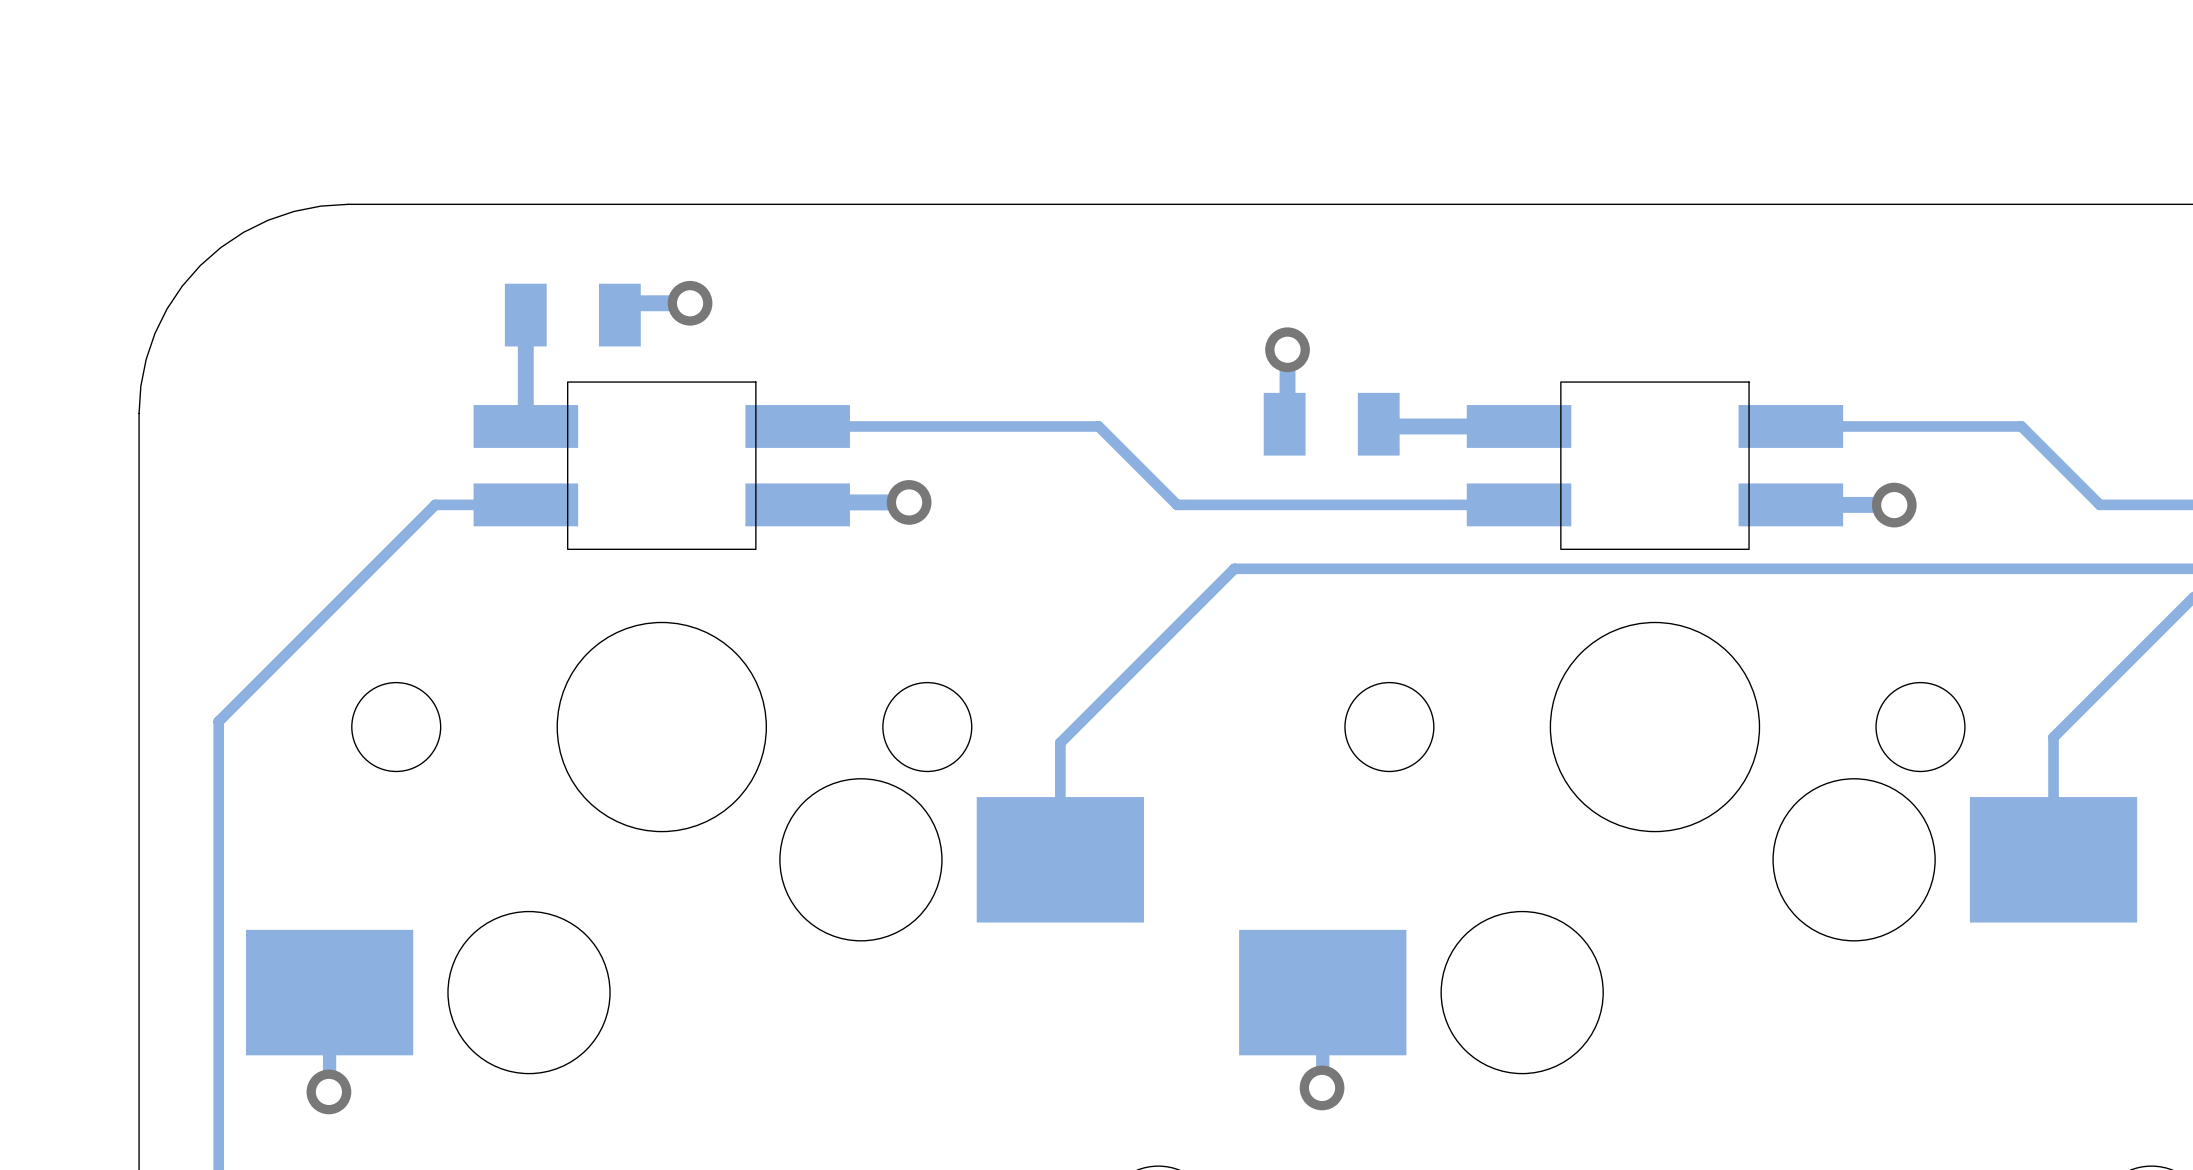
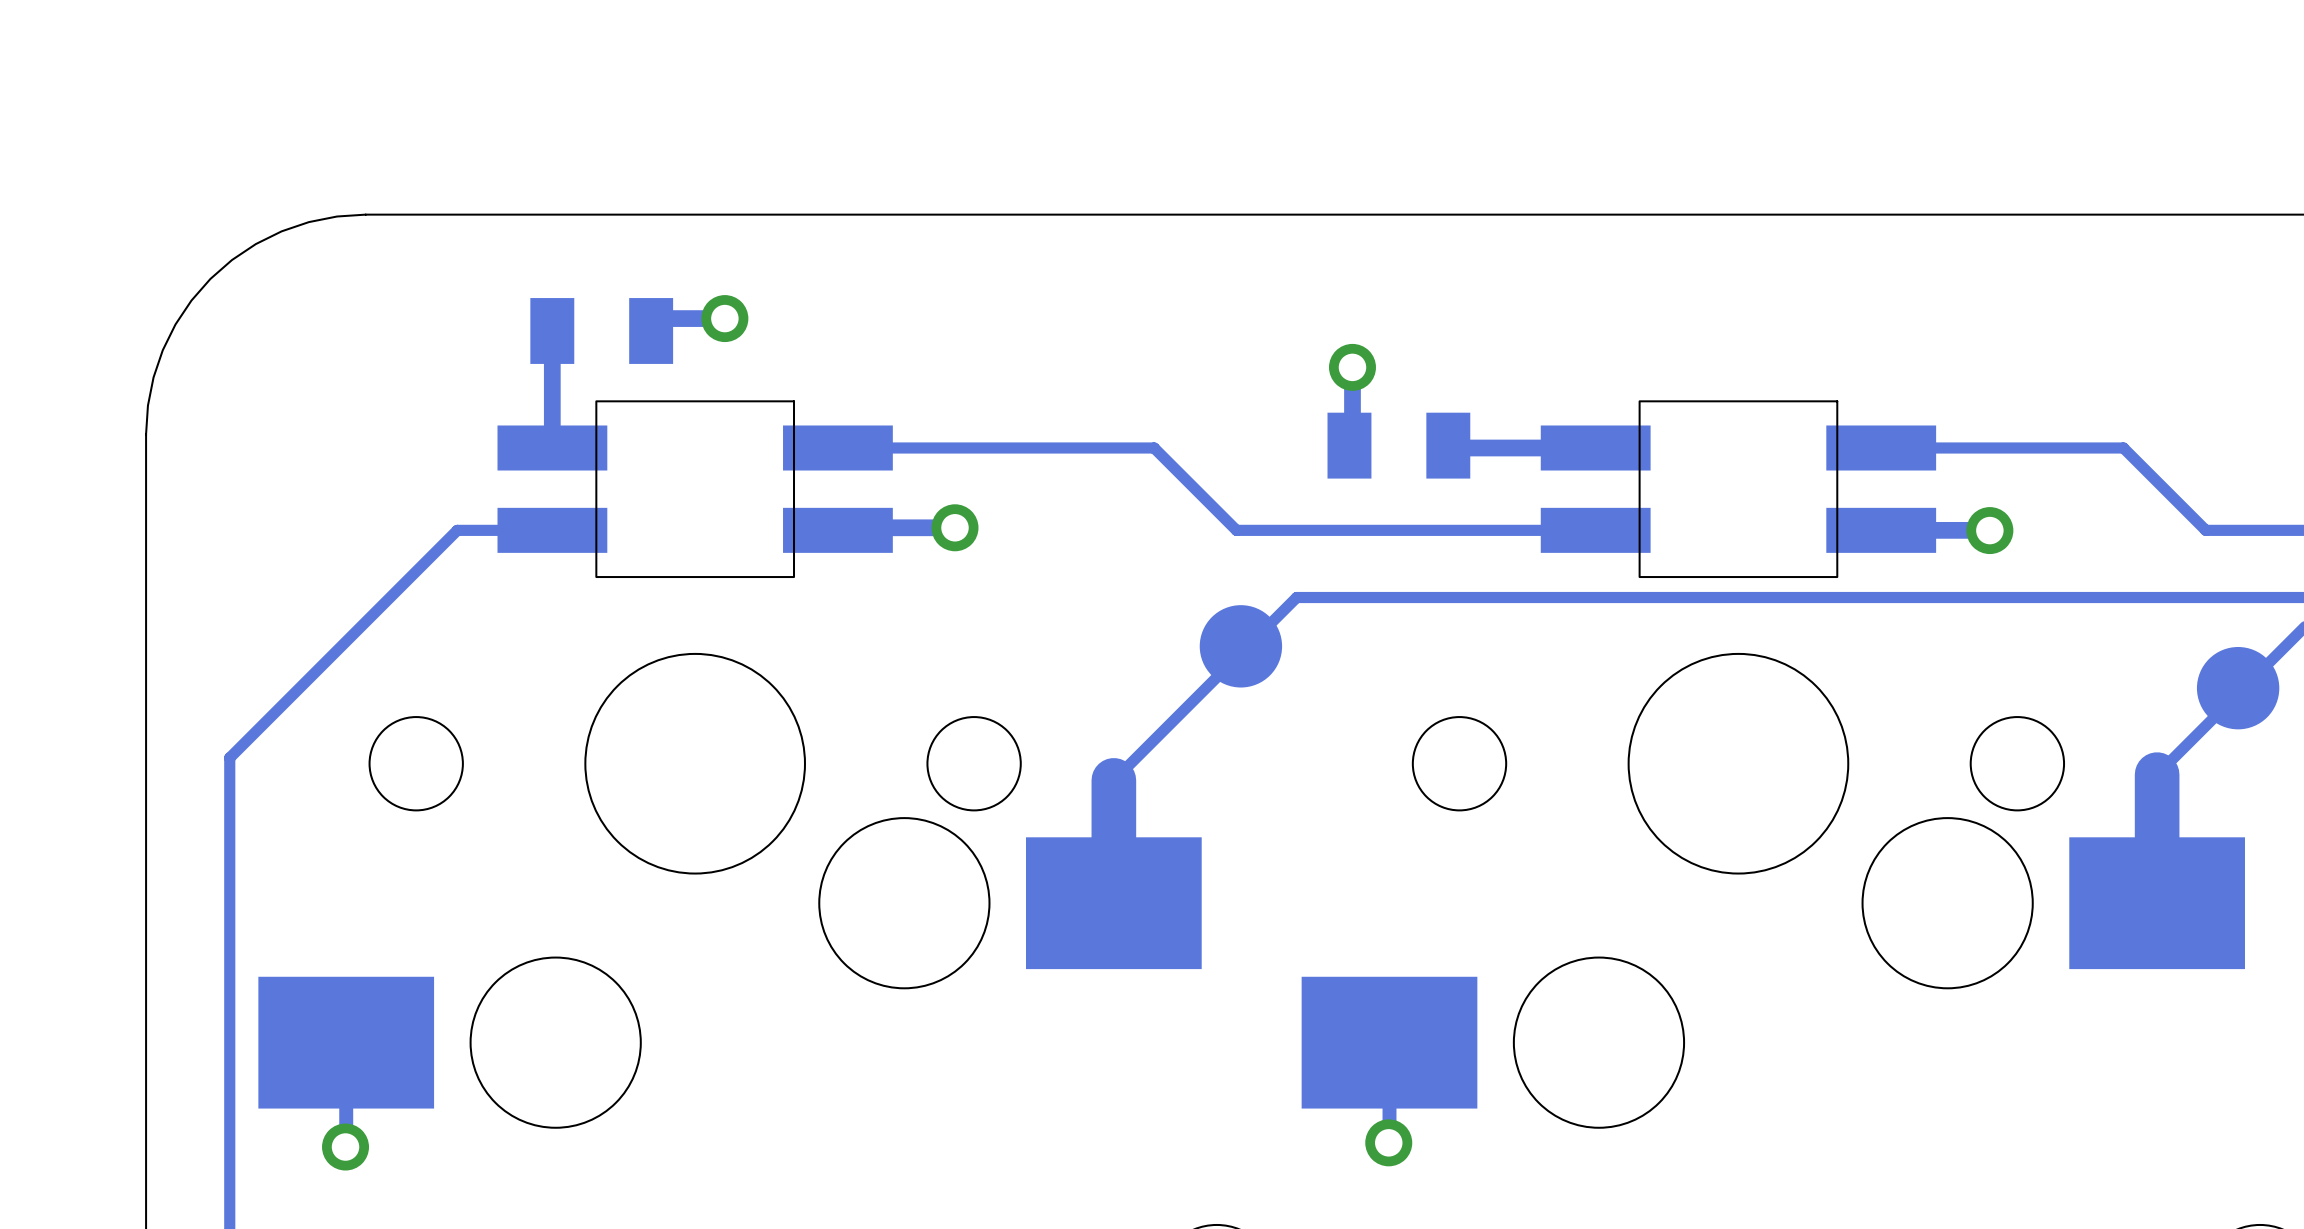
part: none -> (1240, 646)
part: none -> (2238, 688)
bottom track width: thin (2053, 737) (2053, 859) -> thick (2157, 774) (2157, 903)
bottom track width: thin (1060, 742) (1060, 859) -> thick (1113, 780) (1113, 903)

